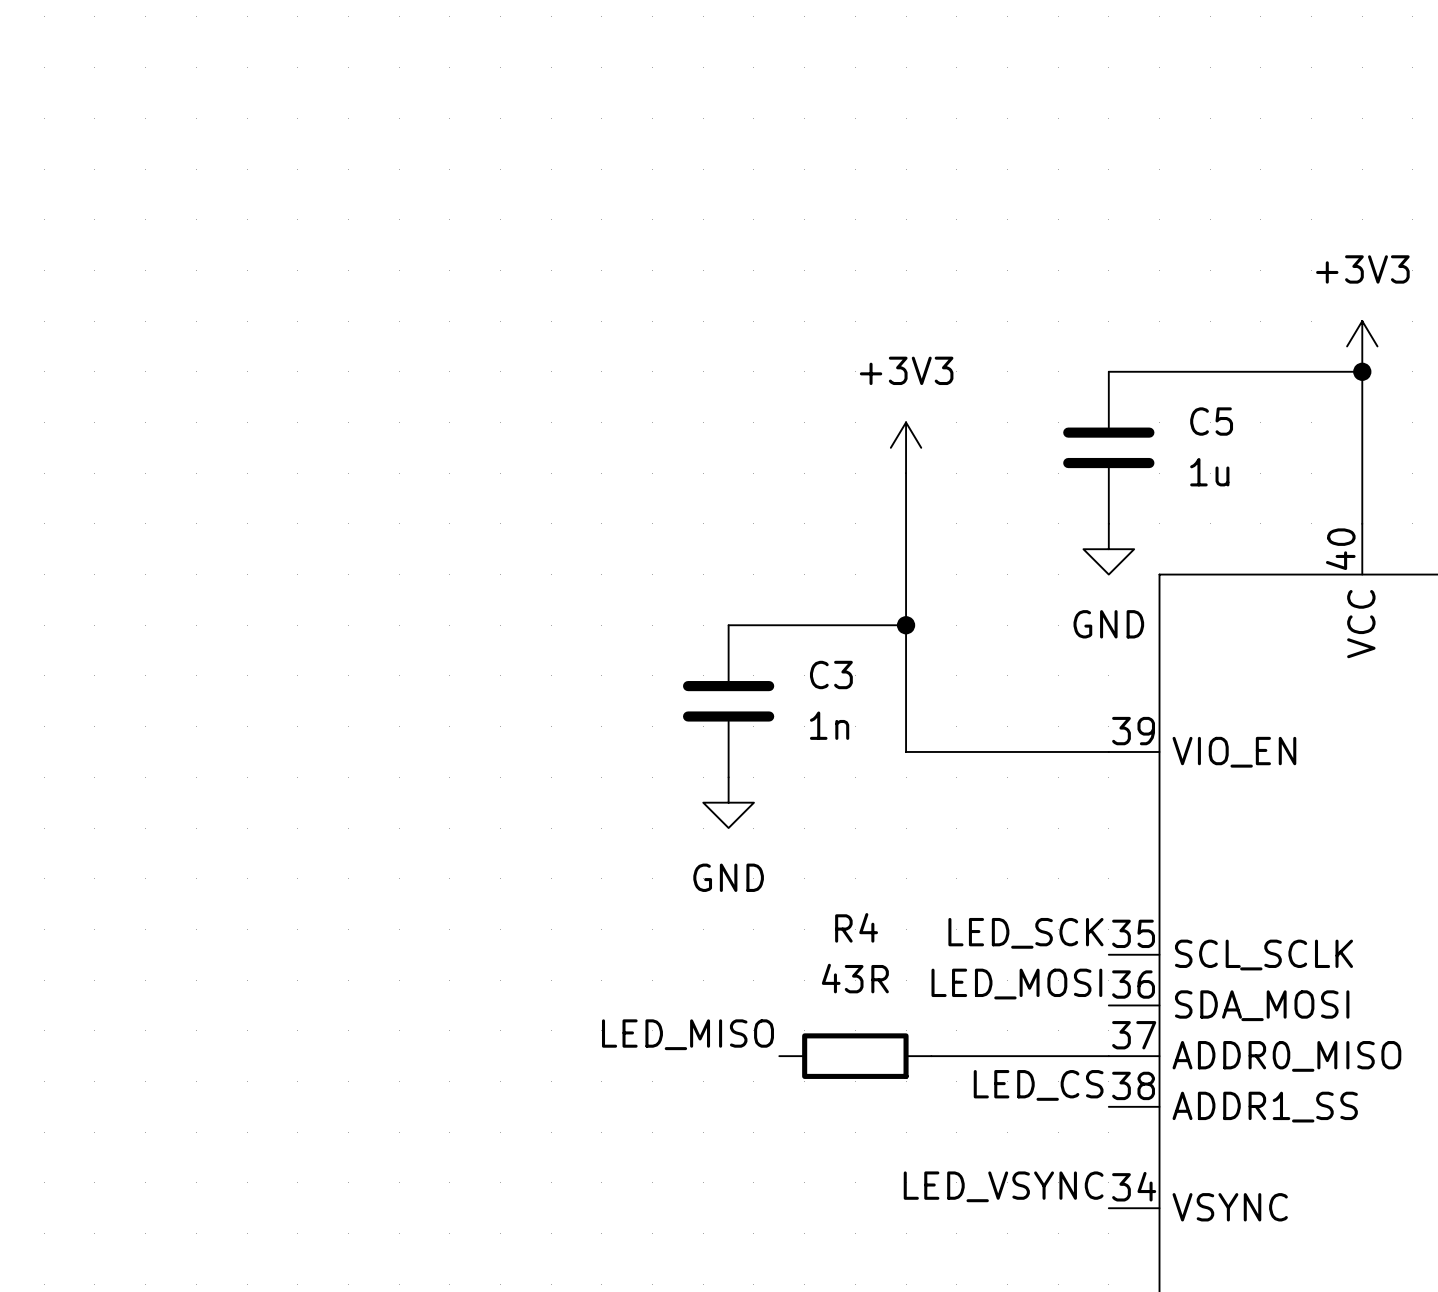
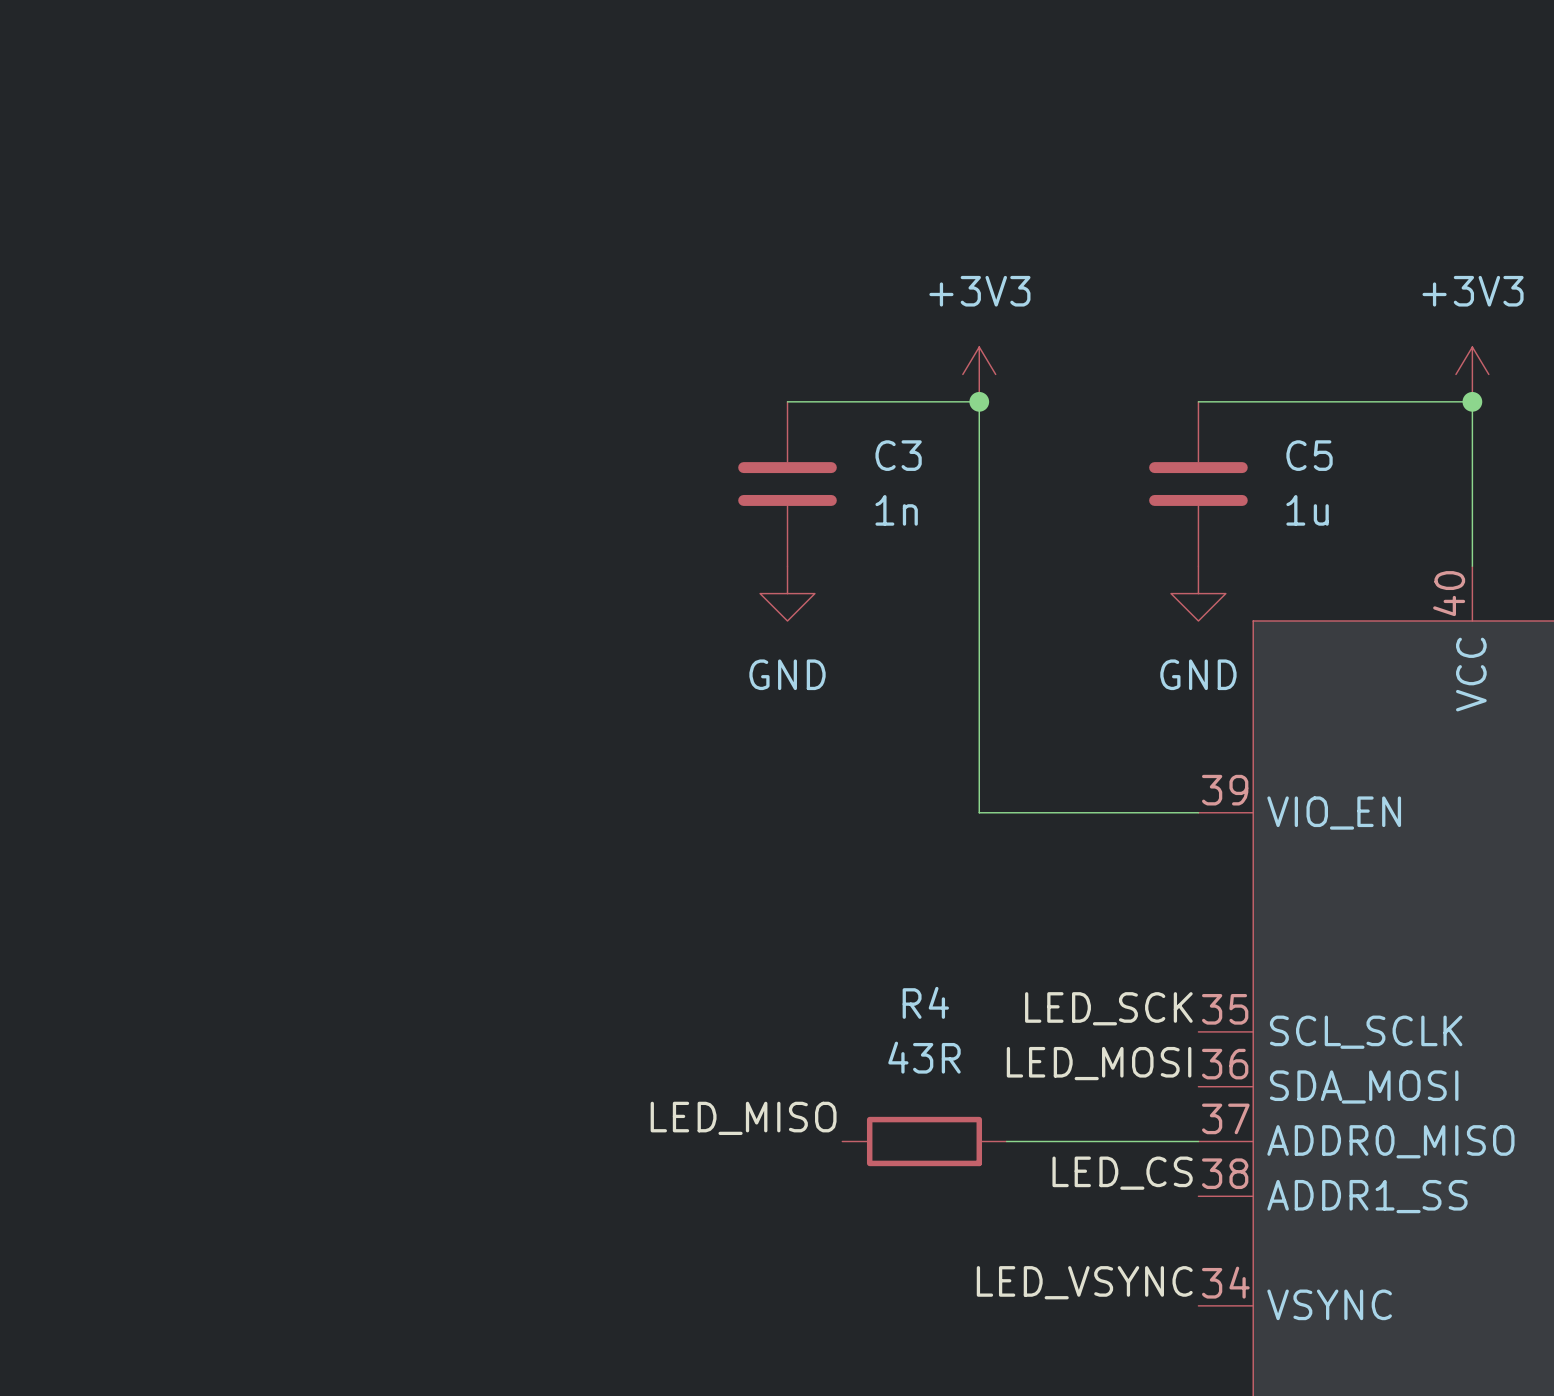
wire: none -> (787, 401) (979, 401) (979, 511)
junction: none -> (979, 401)
power symbol position: +3V3 (906, 447) -> +3V3 (979, 374)
wire: (728, 625) (906, 625) -> none
junction: (906, 625) -> none
C3 position: (728, 701) -> (787, 484)
power symbol position: GND (728, 802) -> GND (787, 593)

